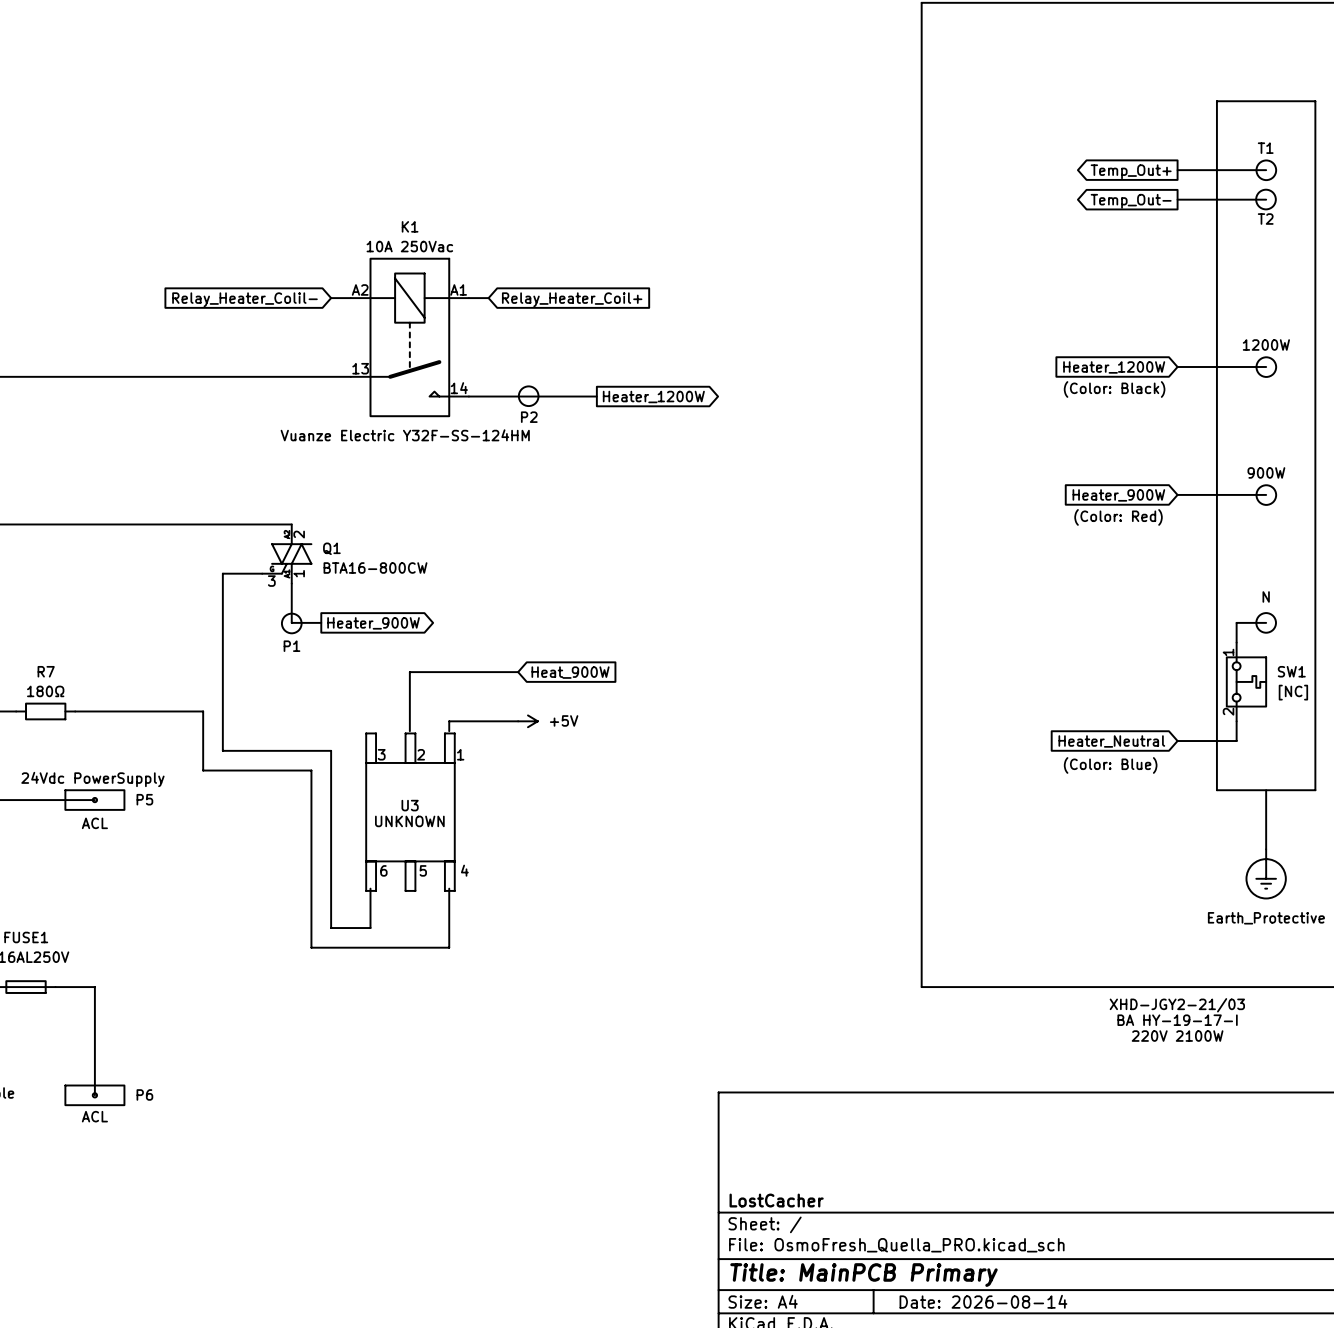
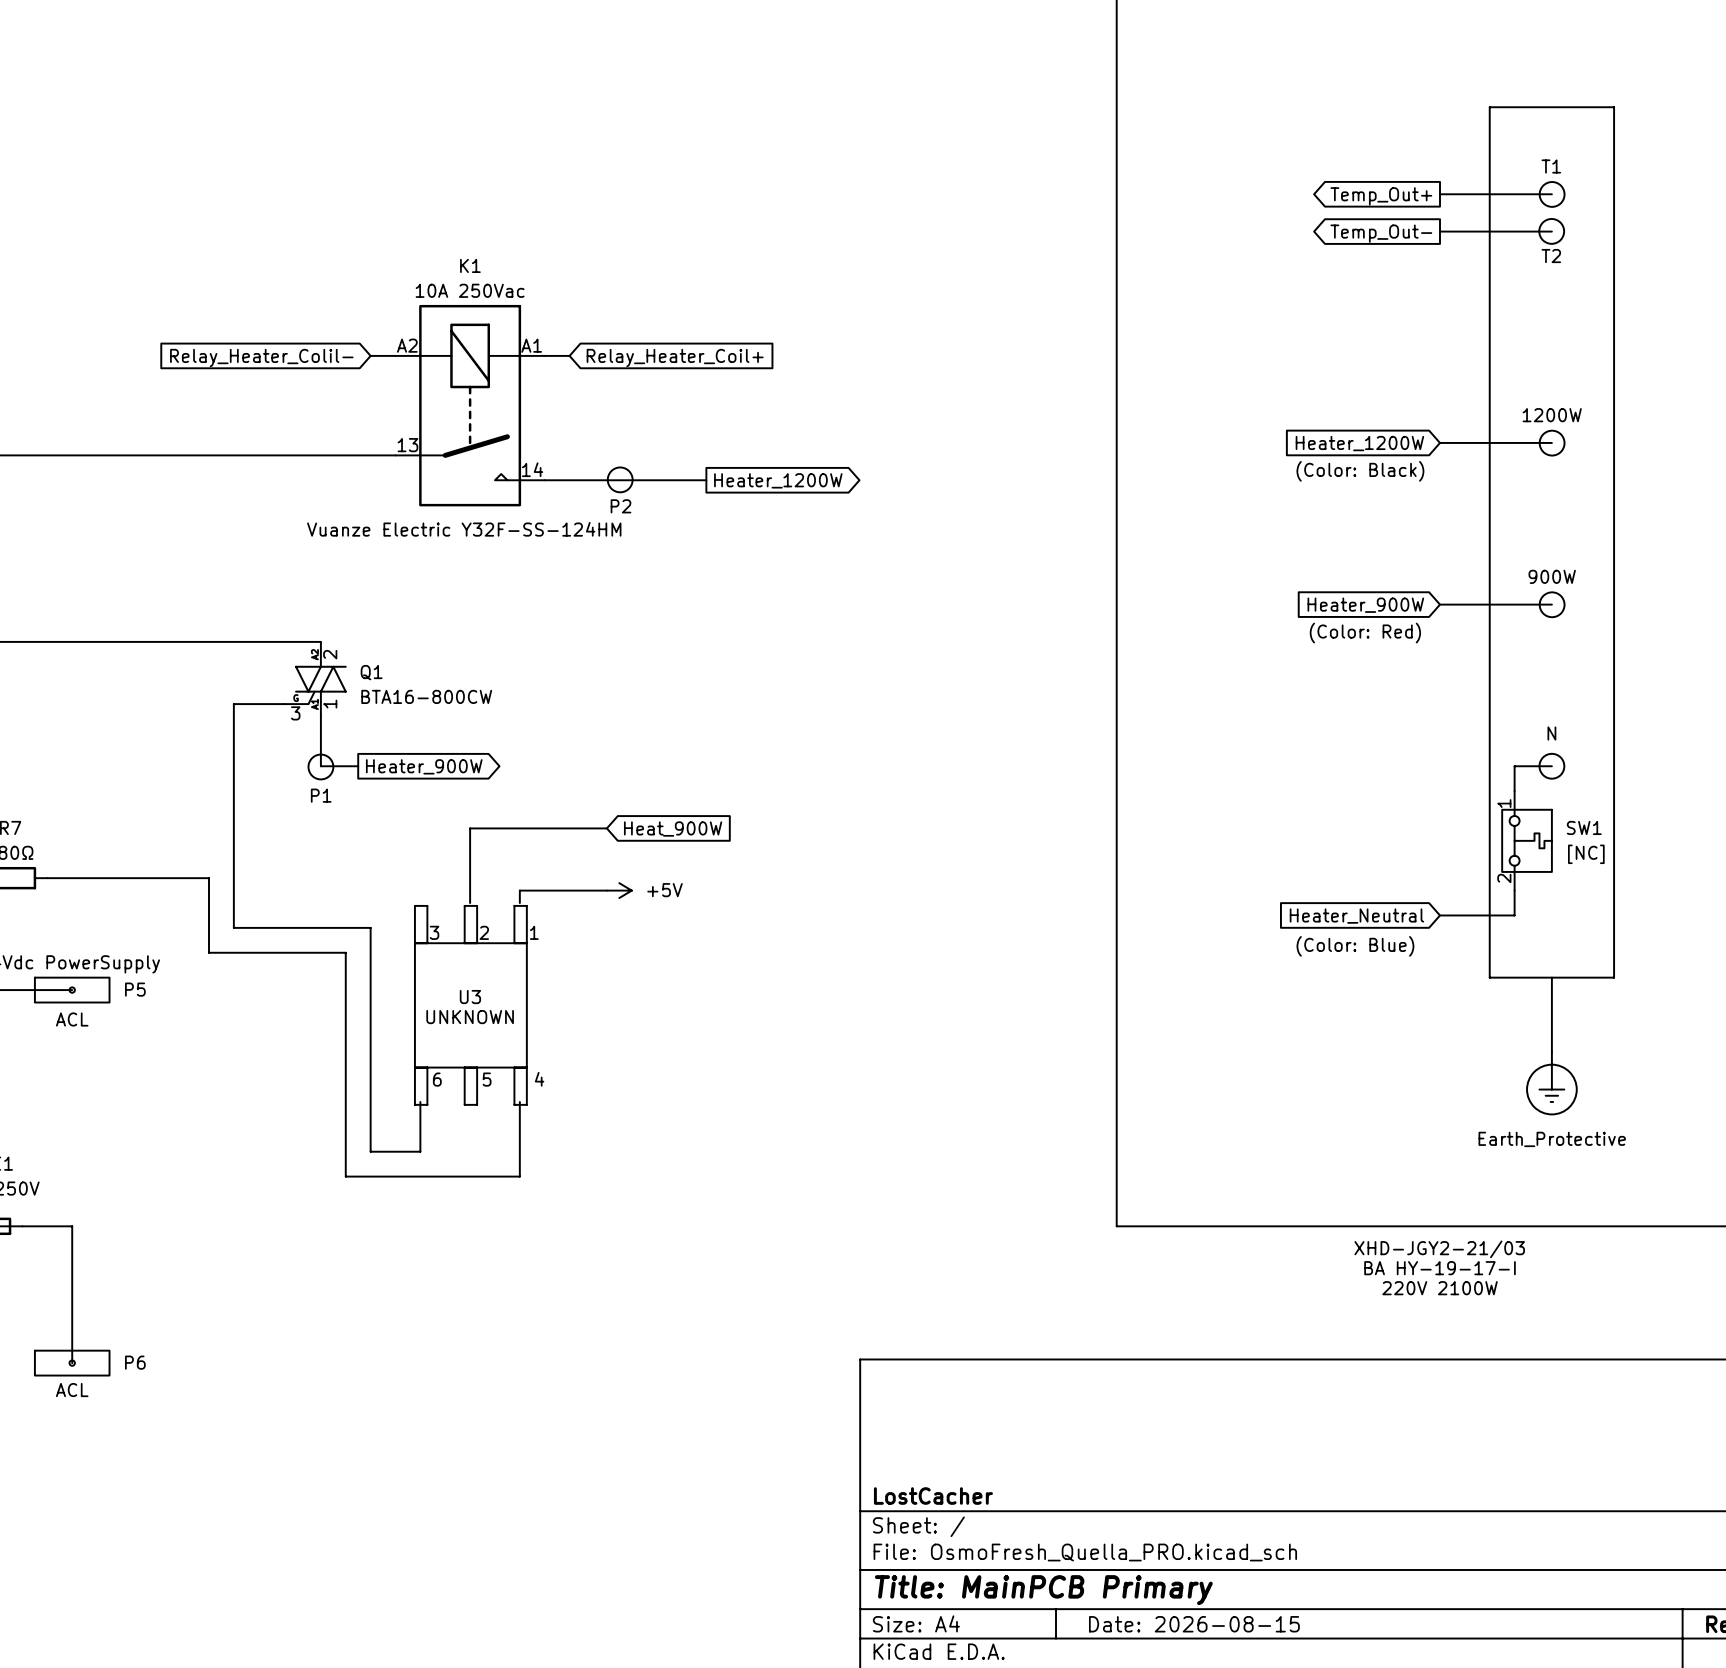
title block: Date: 2026-08-14 (983, 1301) -> Date: 2026-08-15 (1194, 1624)

